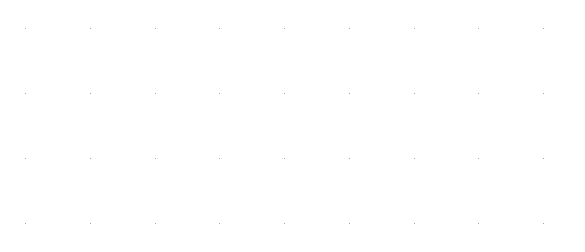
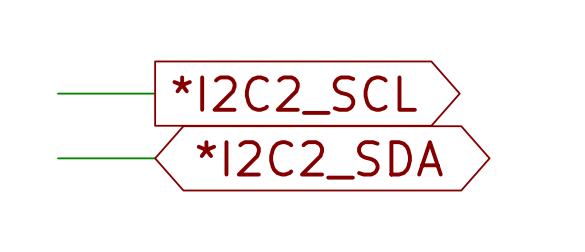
wire: none -> (58, 93) (155, 93)
global label: none -> *I2C2_SCL (294, 95)
wire: none -> (58, 158) (155, 158)
global label: none -> *I2C2_SDA (319, 159)

